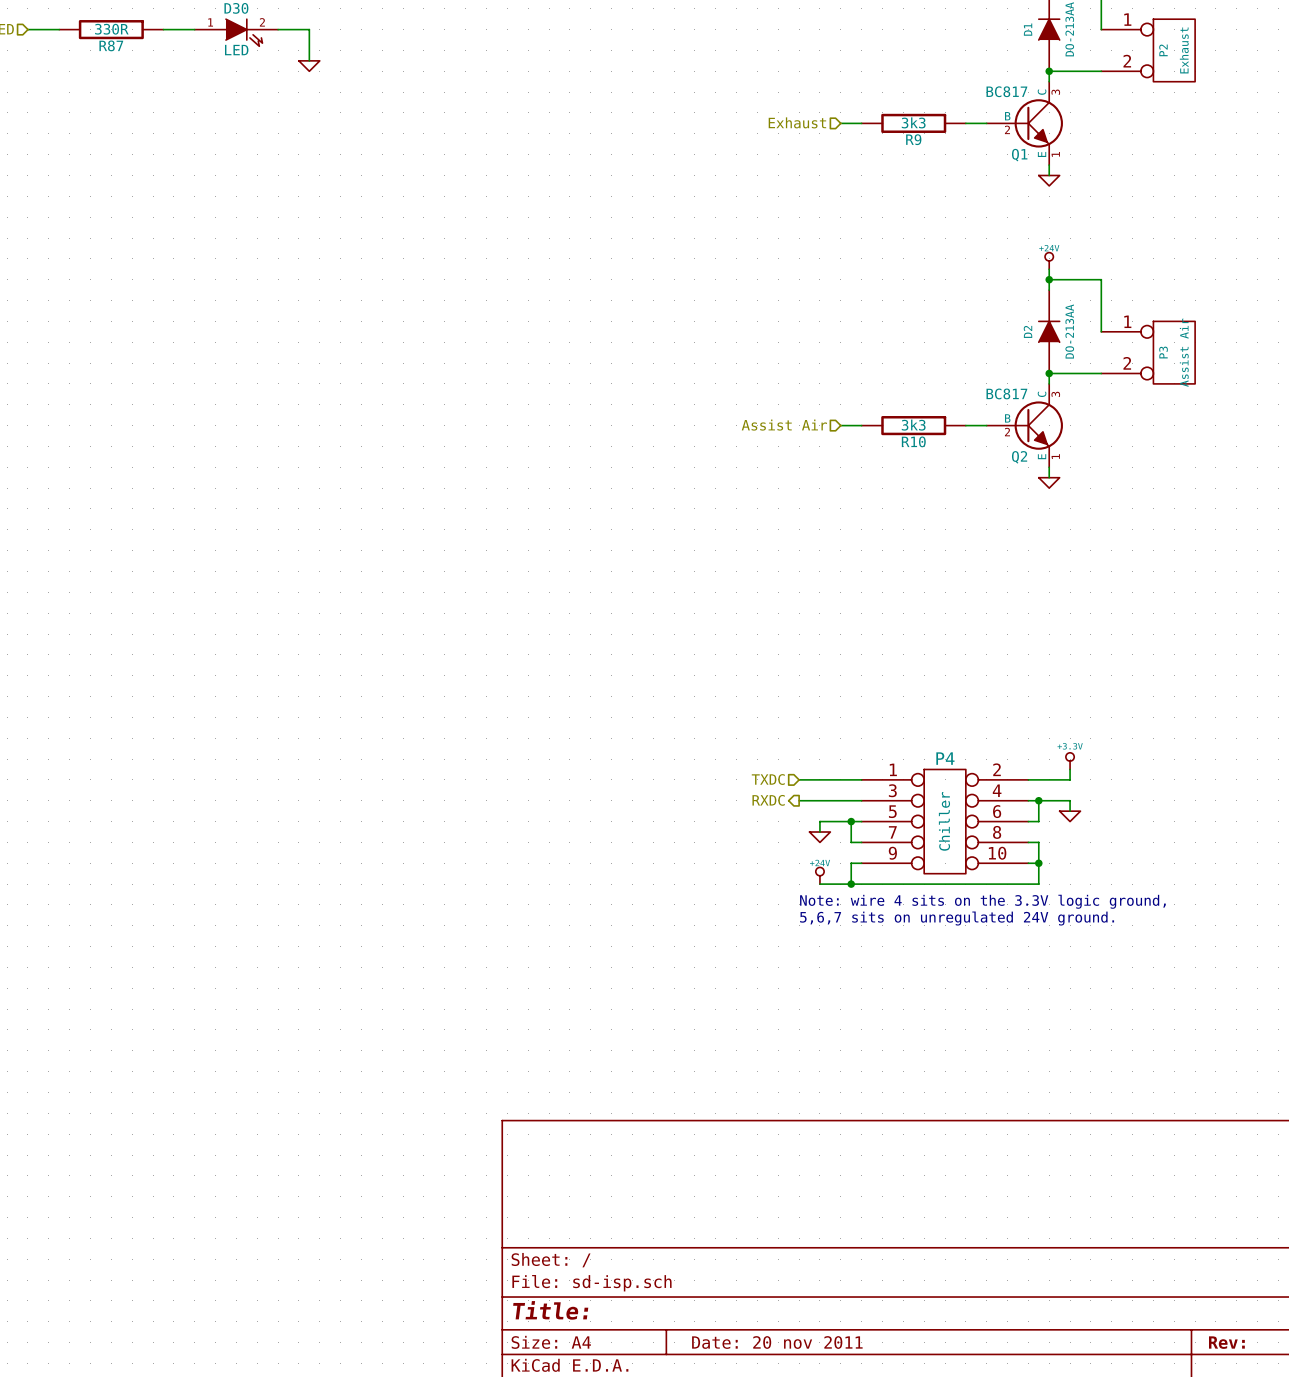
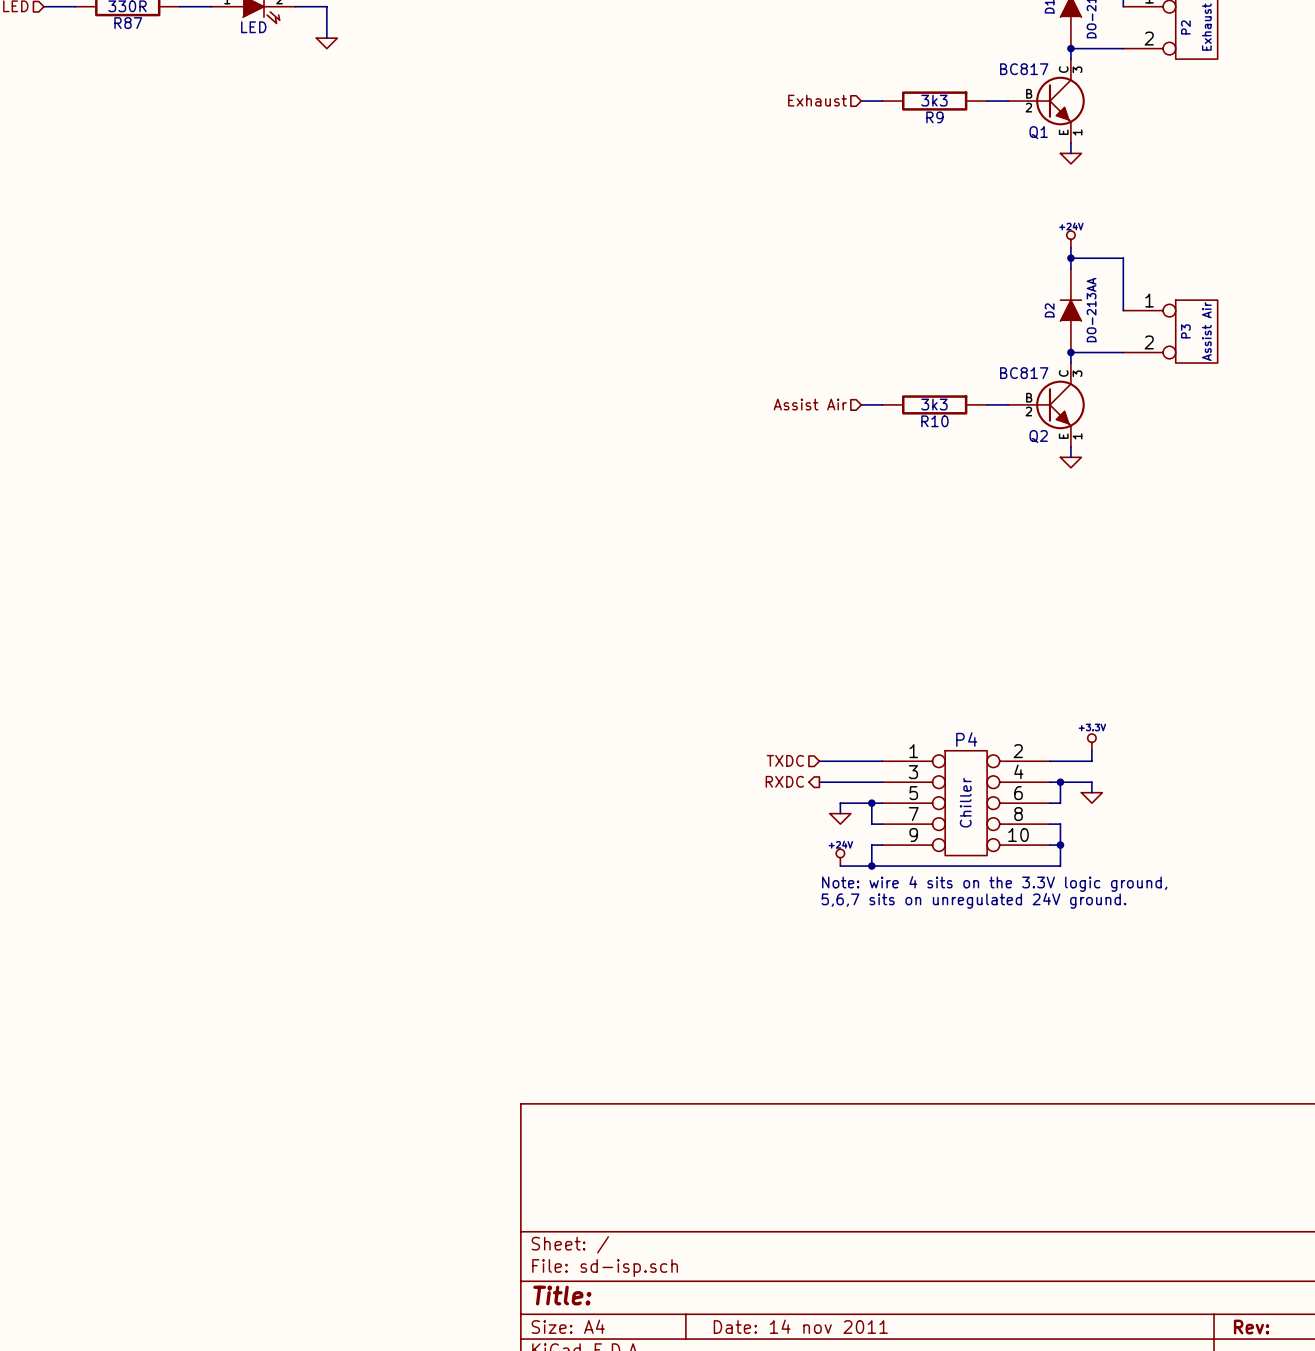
title block: Date: 20 nov 2011 (777, 1342) -> Date: 14 nov 2011 (800, 1326)

